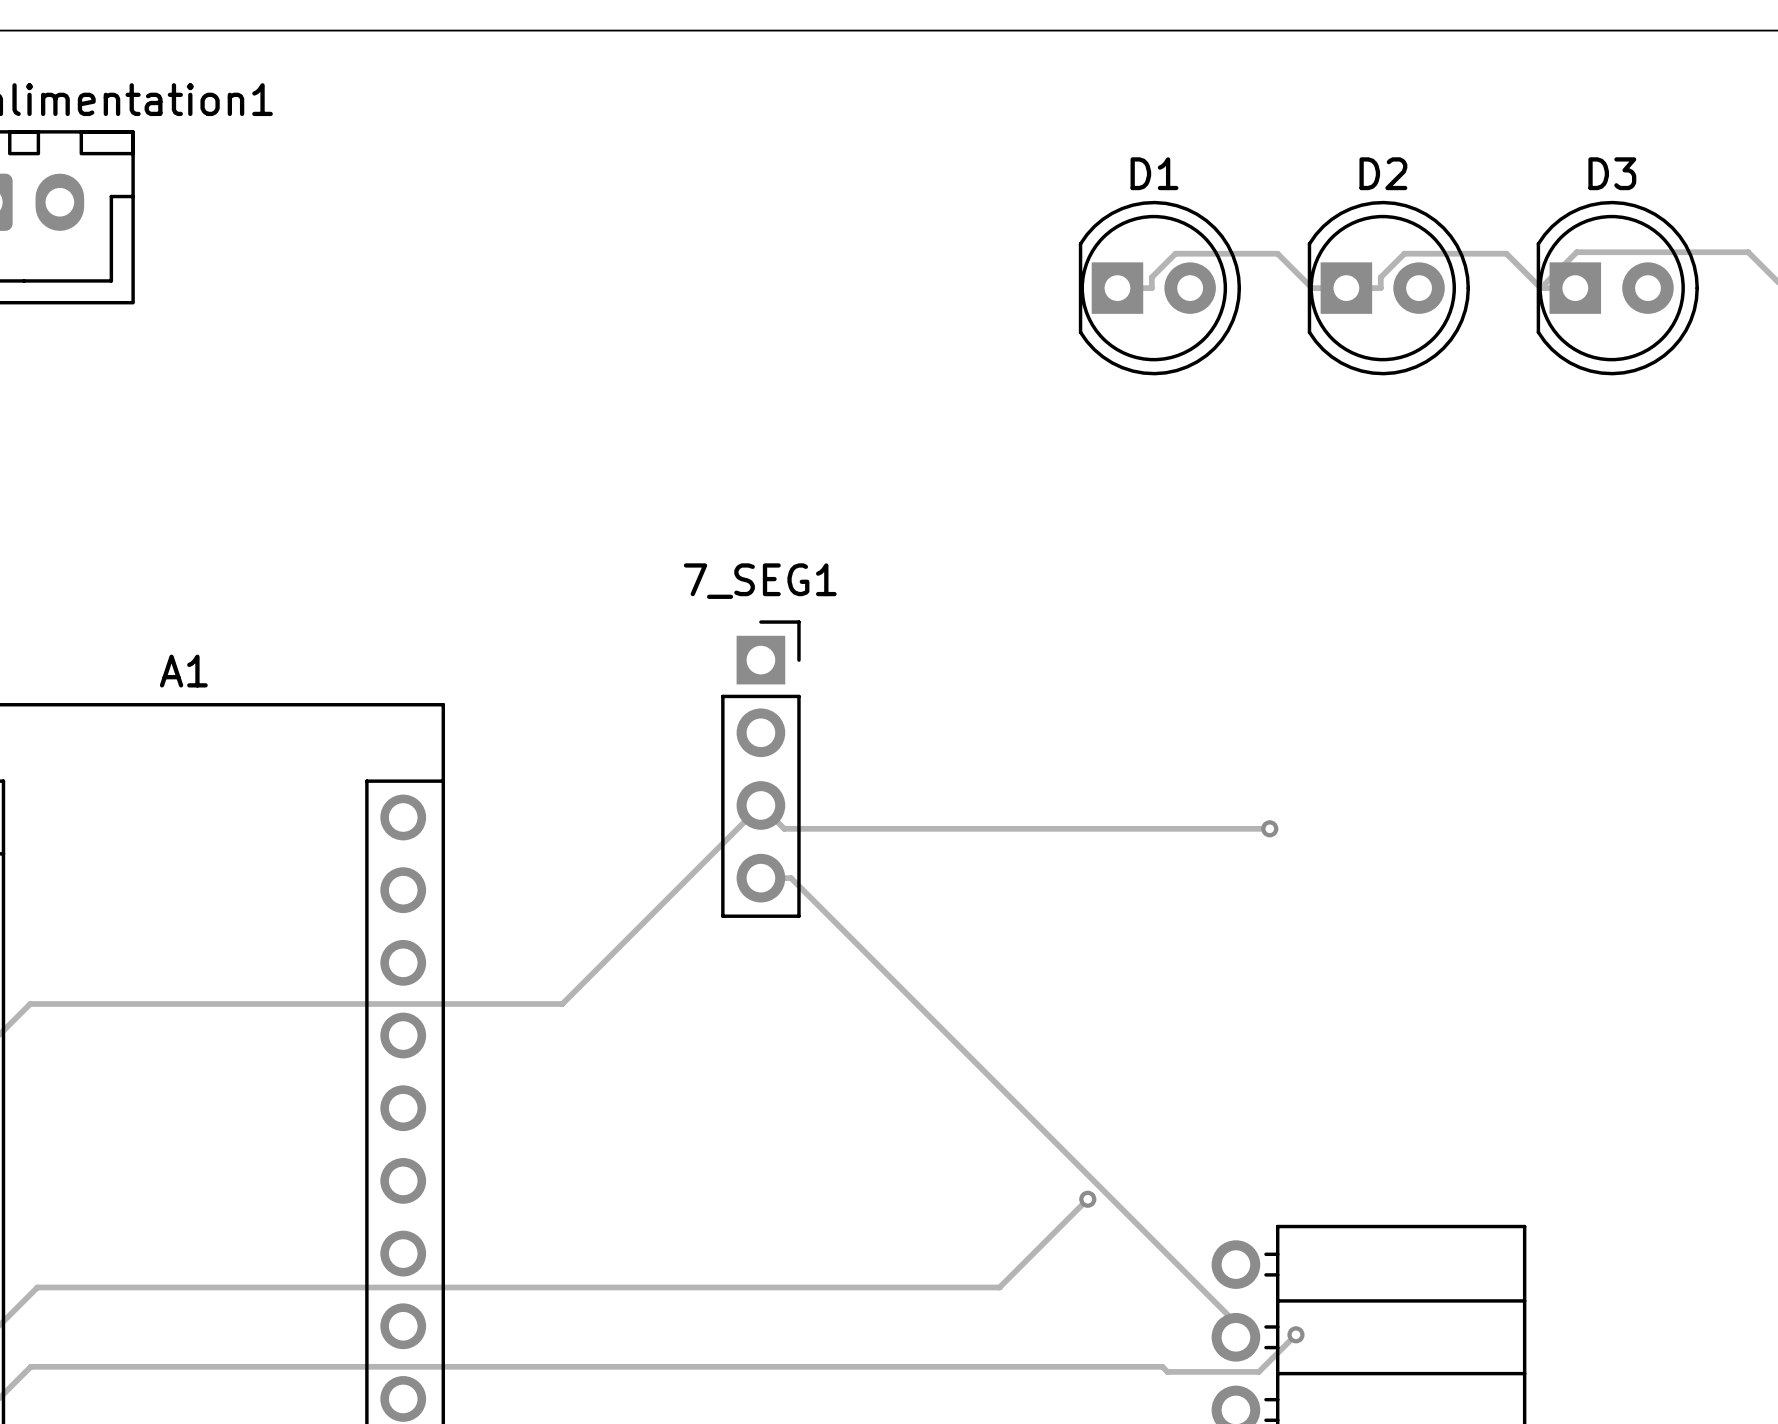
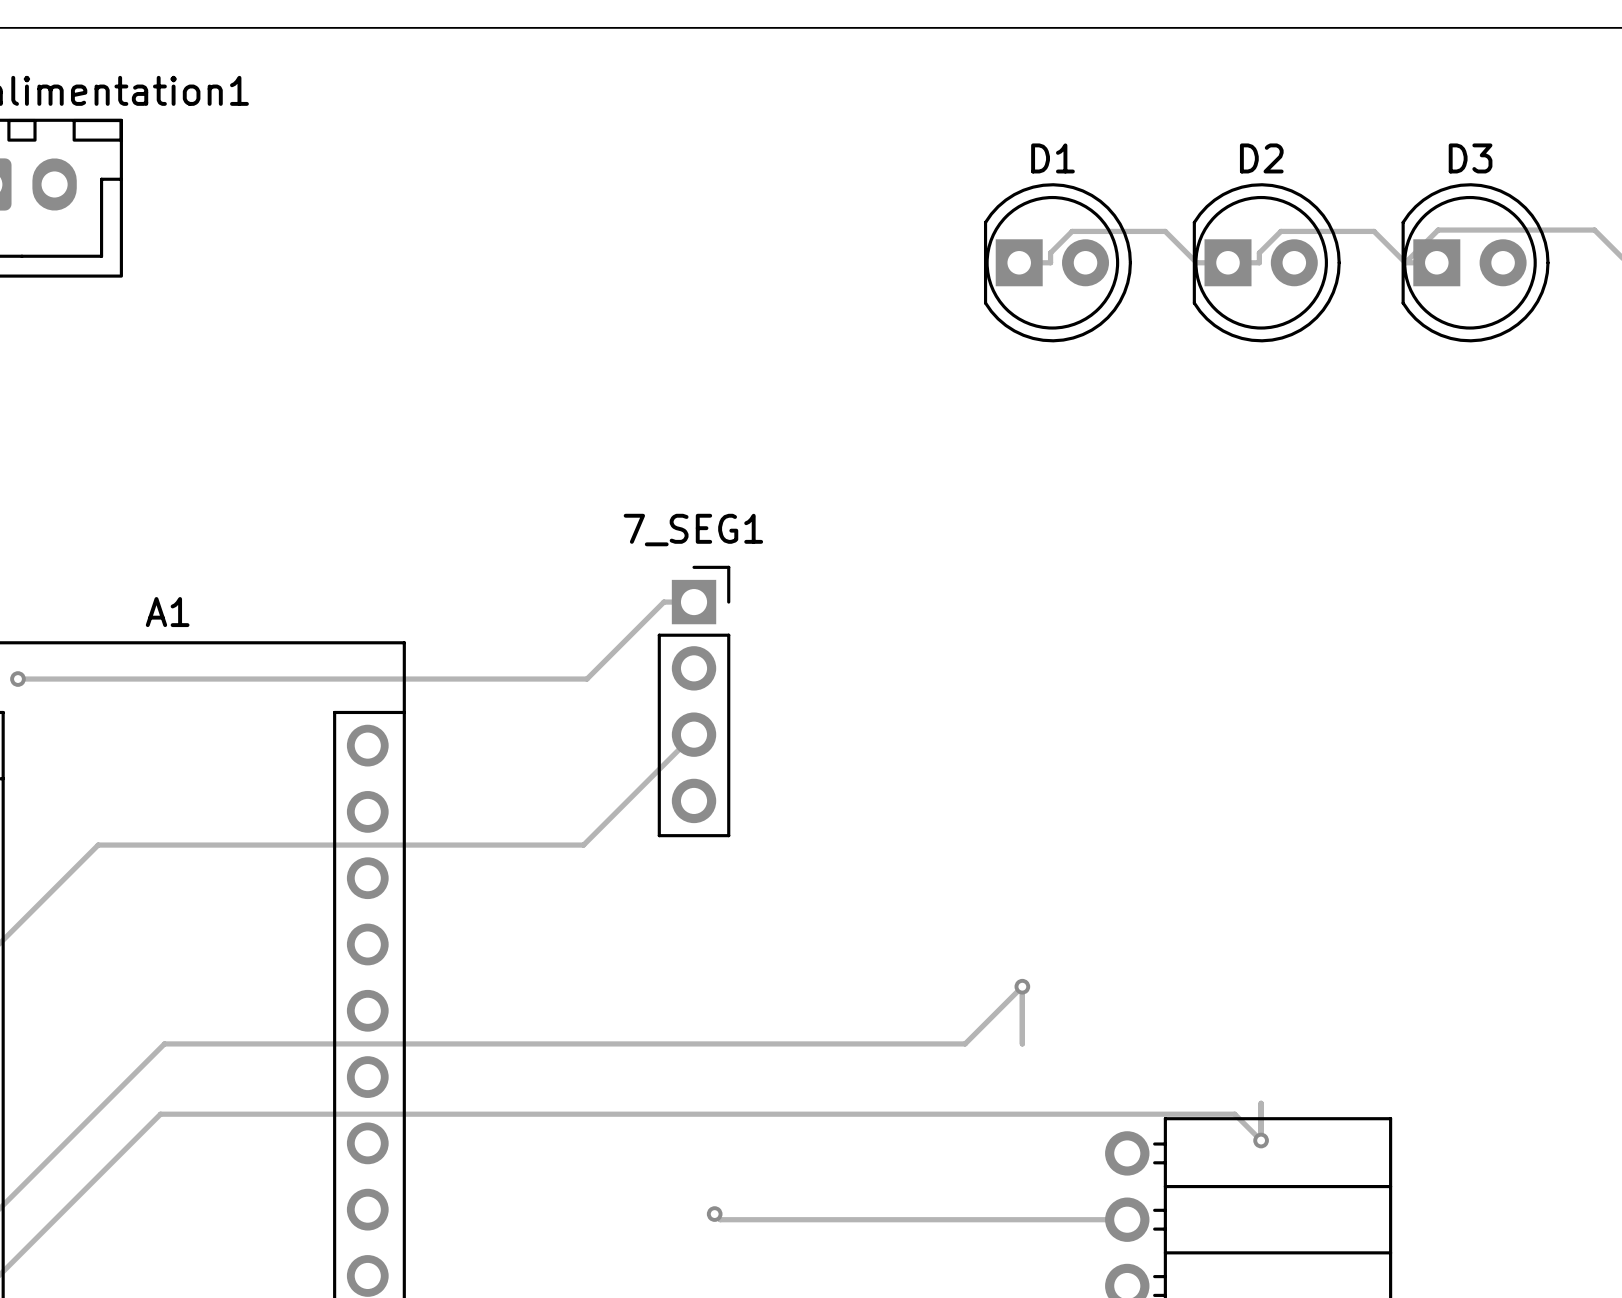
track: none -> (694, 602) (663, 602) (587, 679) (17, 679)
via: none -> (17, 679)
track: (760, 805) (784, 828) (1269, 828) -> none
via: (1269, 828) -> none
track: (760, 878) (791, 878) (1235, 1323) (1235, 1337) -> (714, 1214) (720, 1219) (1127, 1219)
track: (639, 926) (562, 1004) (30, 1004) -> (583, 845) (98, 845) (27, 915)
track: (1087, 1199) (999, 1287) (37, 1287) -> (1022, 1043) (1022, 986) (965, 1043) (164, 1043) (34, 1174)
via position: (1087, 1199) -> (1022, 986)
via: none -> (1261, 1140)
via: none -> (714, 1214)
track: (1295, 1334) (1258, 1371) (1167, 1371) (1162, 1366) (30, 1366) -> (1261, 1103) (1261, 1140) (1234, 1114) (160, 1114) (28, 1246)
via: (1295, 1334) -> none

